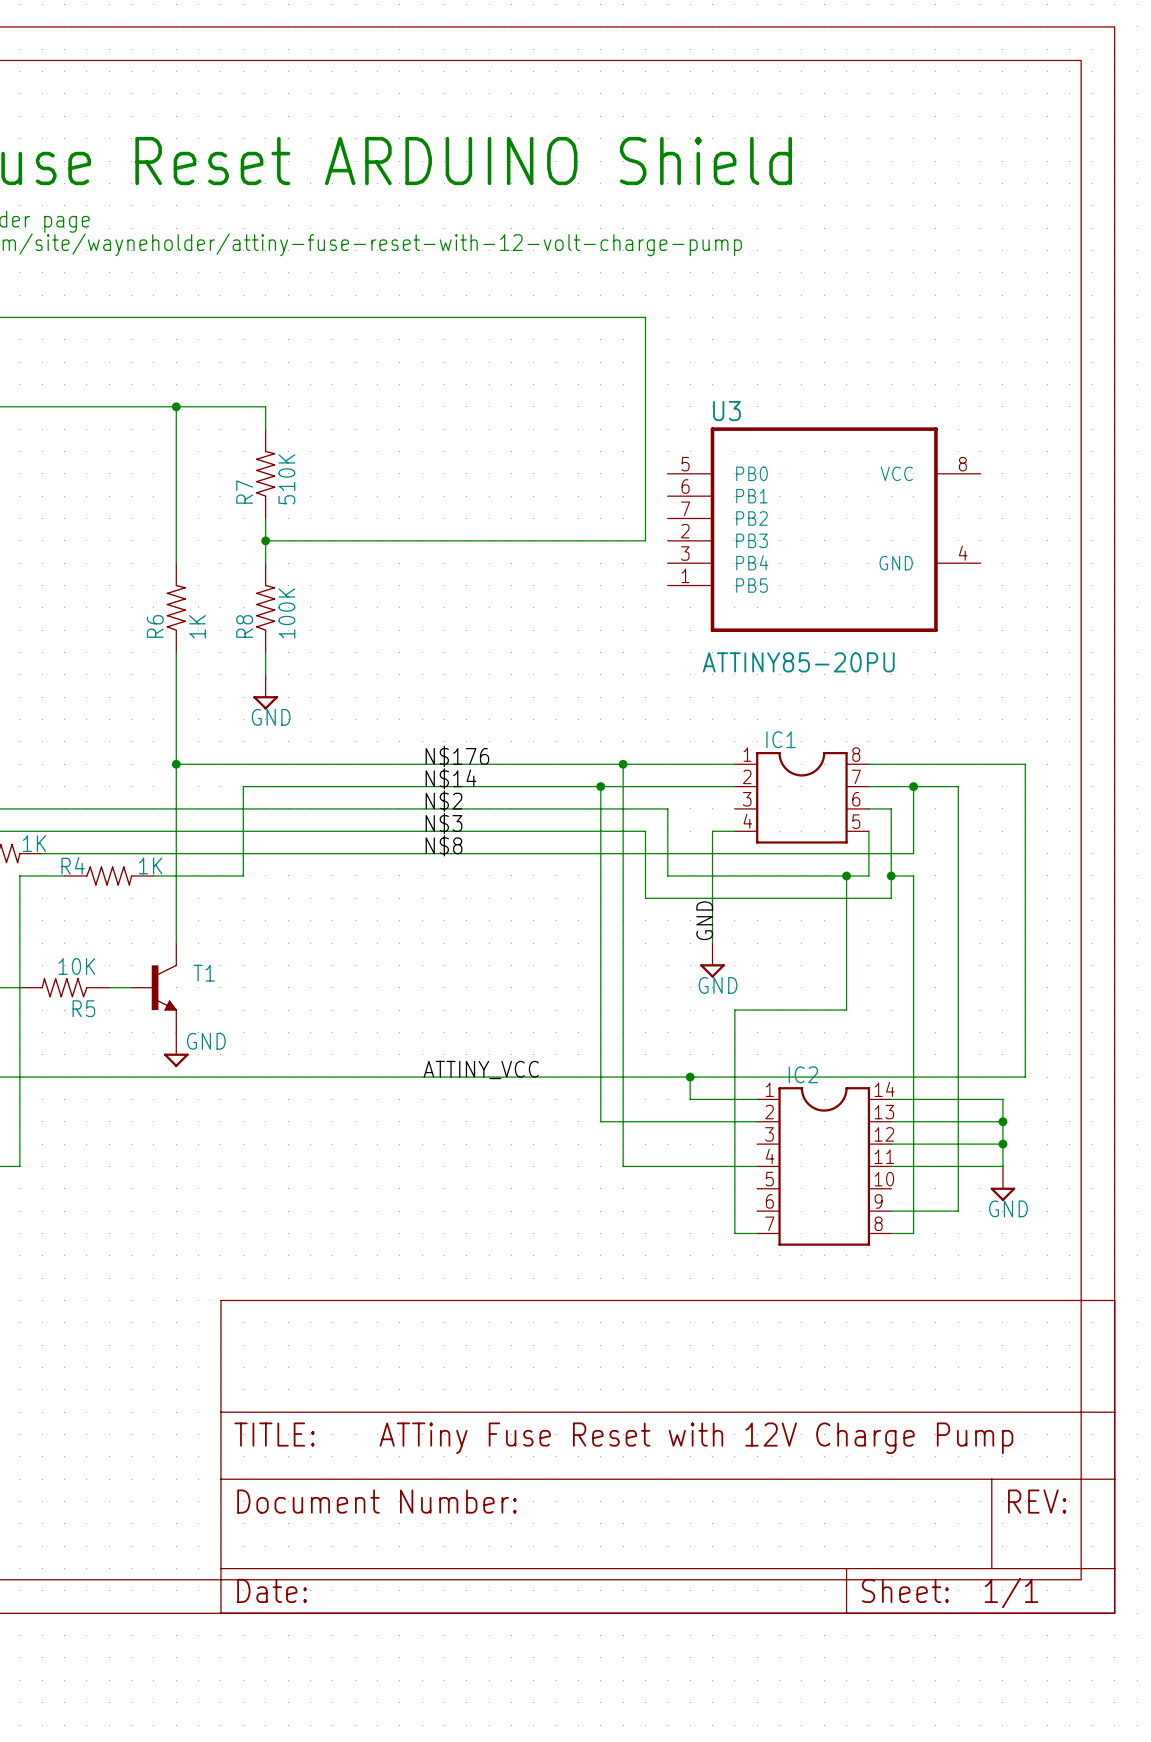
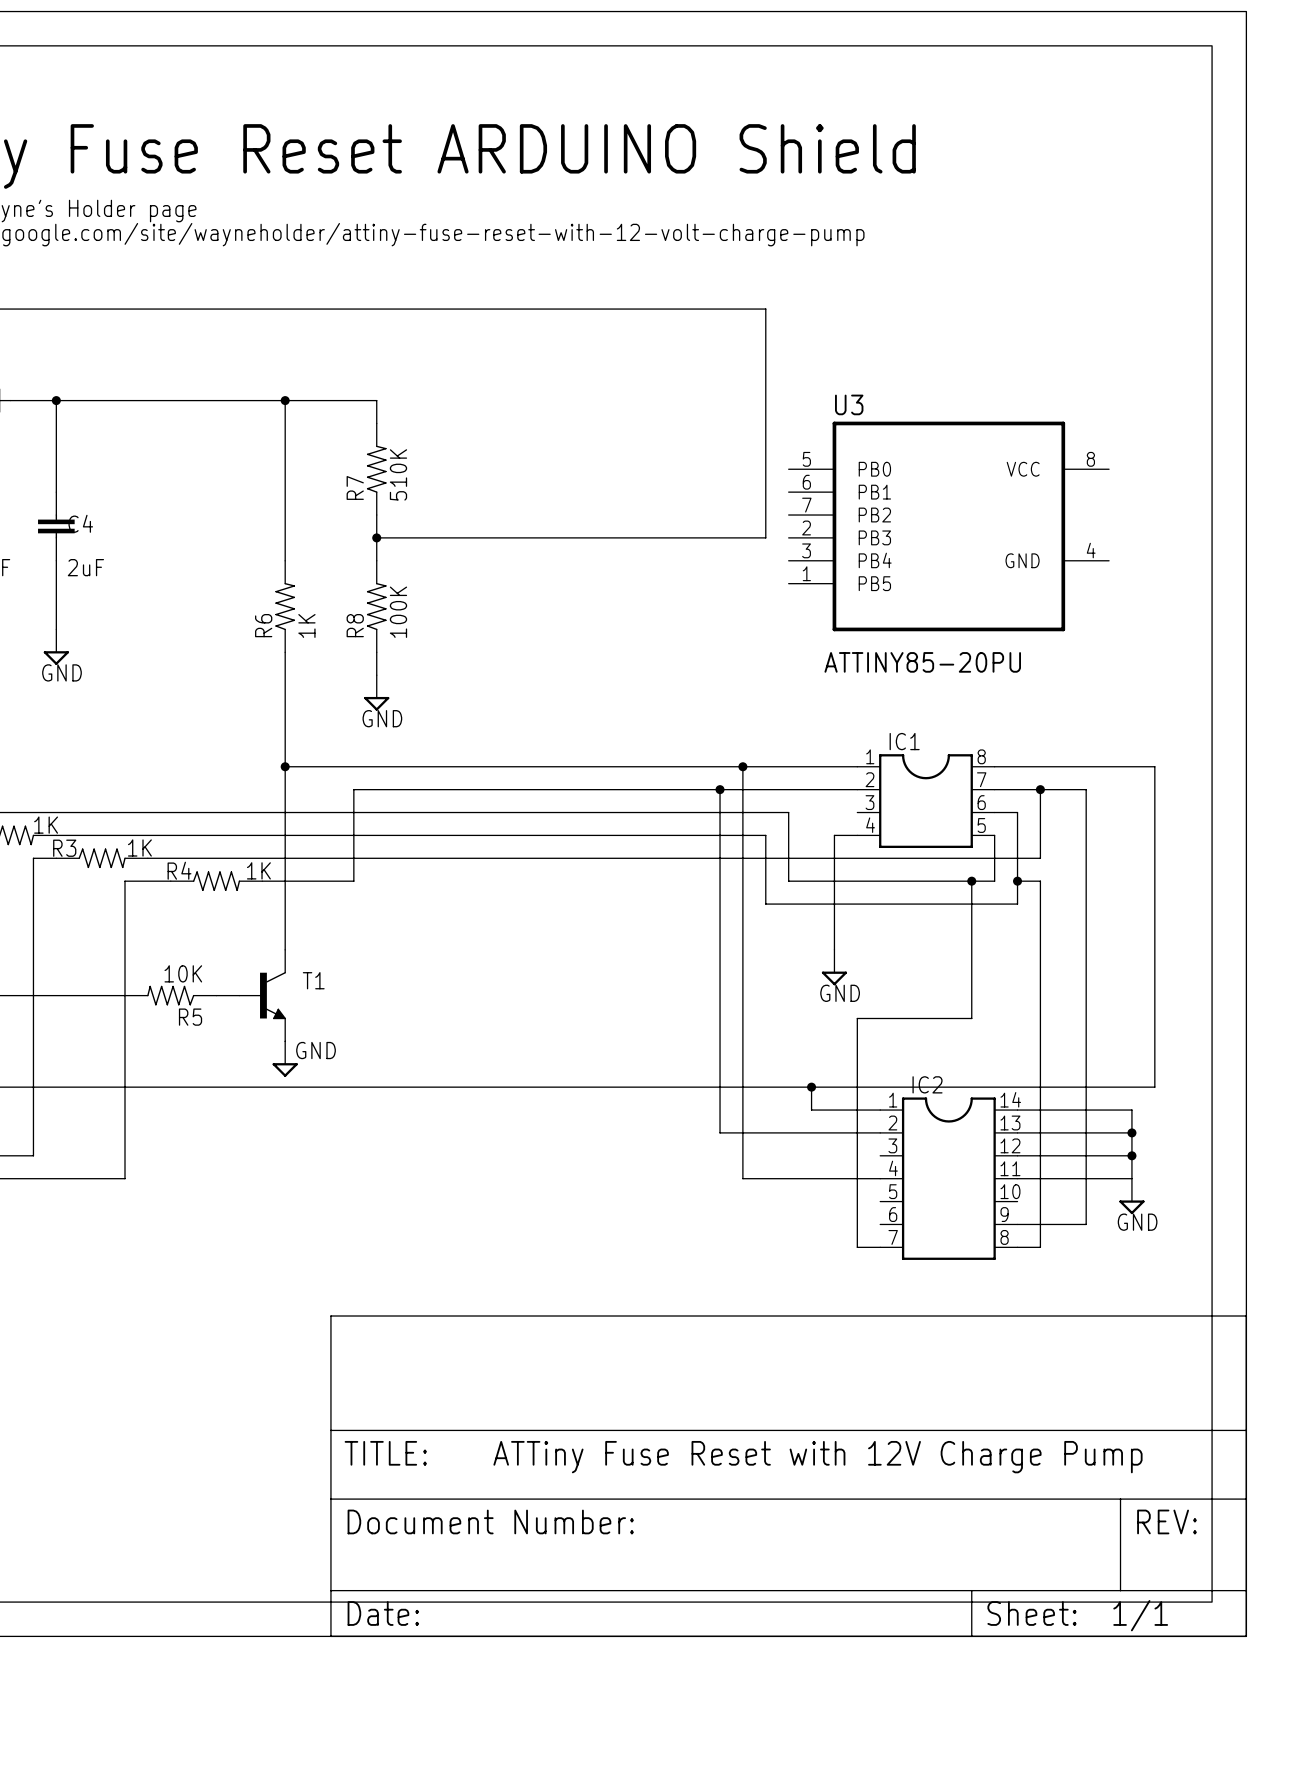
label: N$176 (457, 756) -> none
label: N$14 (451, 778) -> none
label: N$2 (443, 801) -> none
label: N$3 (443, 823) -> none
label: N$8 (443, 845) -> none
label: GND (704, 920) -> none
label: ATTINY_VCC (481, 1069) -> none

